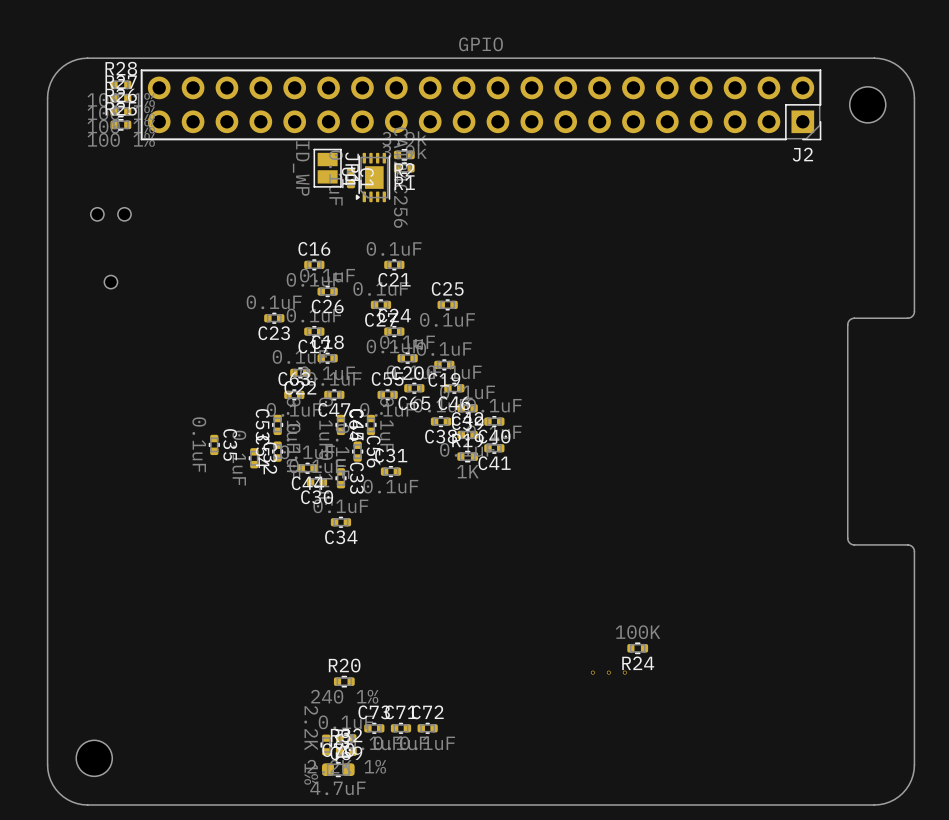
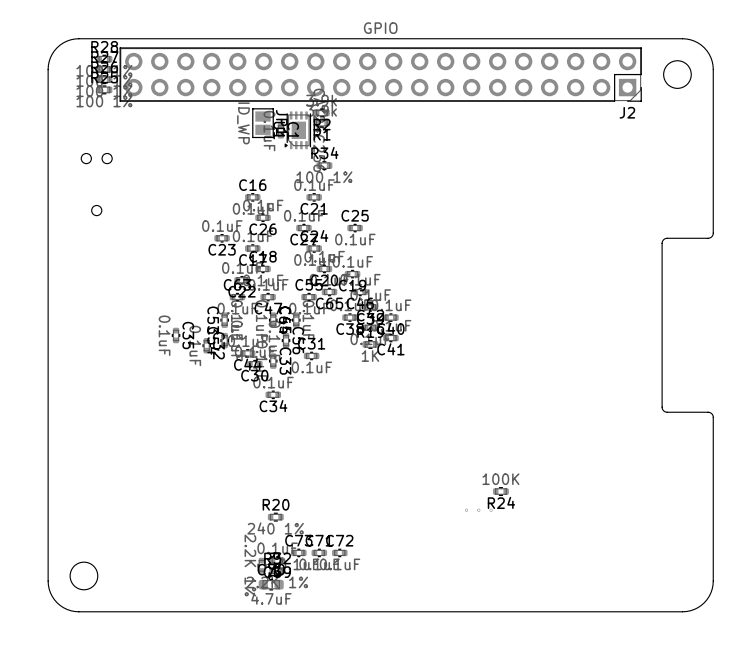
R34: none -> 100 1% (324, 165)

